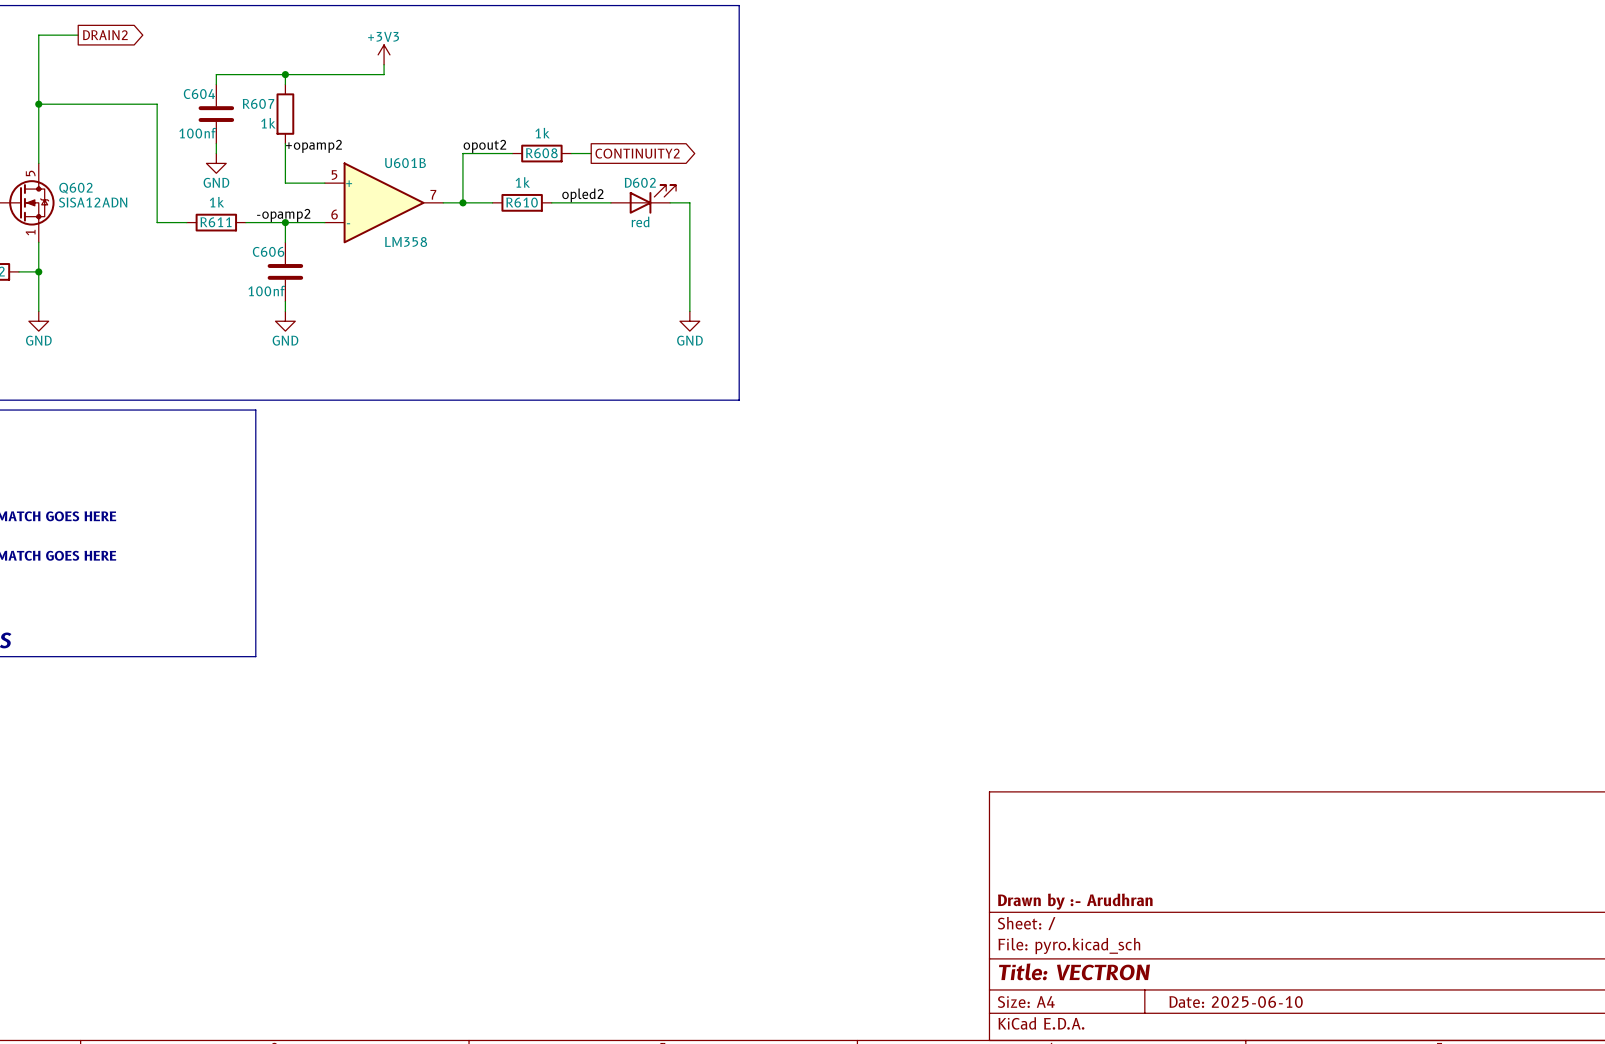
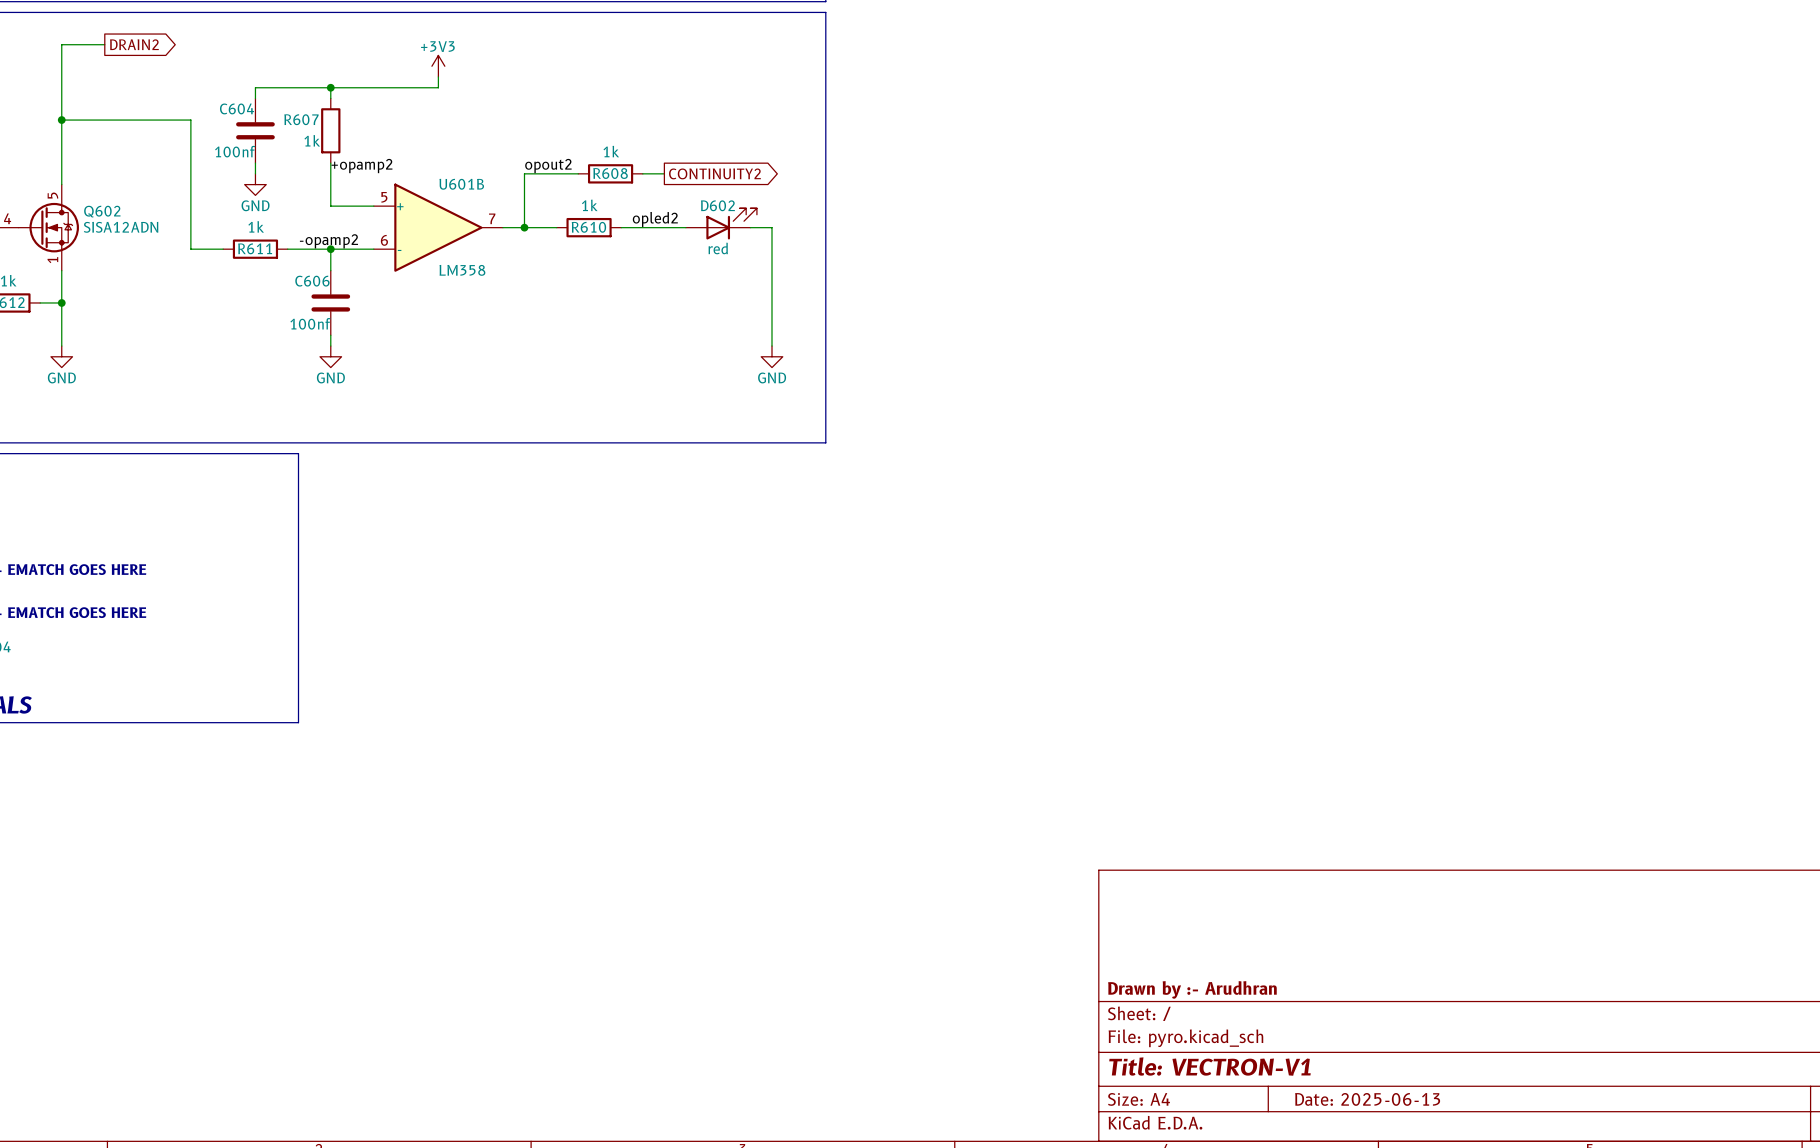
title block: Title: VECTRON (1074, 971) -> Title: VECTRON-V1 (1209, 1066)
title block: Date: 2025-06-10 (1236, 1002) -> Date: 2025-06-13 (1367, 1099)

